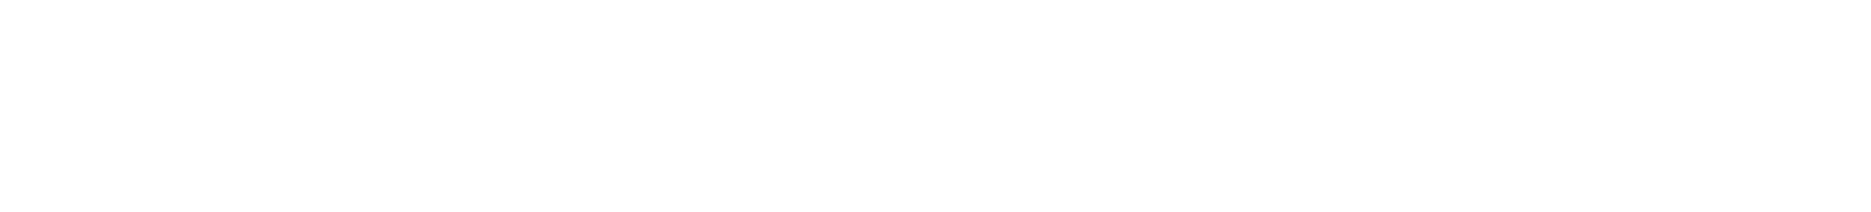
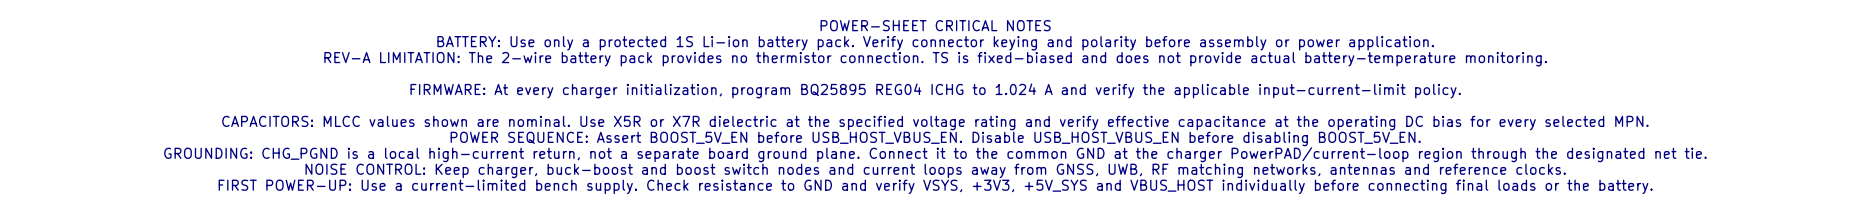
text: none -> POWER-SHEET CRITICAL NOTES (935, 25)
text: none -> BATTERY: Use only a protected 1S Li-ion battery pack. Verify connector keying and polarity before assembly or power application. (935, 43)
text: none -> REV-A LIMITATION: The 2-wire battery pack provides no thermistor connection. TS is fixed-biased and does not provide actual battery-temperature monitoring. (935, 59)
text: none -> FIRMWARE: At every charger initialization, program BQ25895 REG04 ICHG to 1.024 A and verify the applicable input-current-limit policy. (935, 90)
text: none -> CAPACITORS: MLCC values shown are nominal. Use X5R or X7R dielectric at the specified voltage rating and verify effective capacitance at the operating DC bias for every selected MPN. (935, 123)
text: none -> POWER SEQUENCE: Assert BOOST_5V_EN before USB_HOST_VBUS_EN. Disable USB_HOST_VBUS_EN before disabling BOOST_5V_EN. (935, 139)
text: none -> GROUNDING: CHG_PGND is a local high-current return, not a separate board ground plane. Connect it to the common GND at the charger PowerPAD/current-loop region through the designated net tie. (935, 154)
text: none -> NOISE CONTROL: Keep charger, buck-boost and boost switch nodes and current loops away from GNSS, UWB, RF matching networks, antennas and reference clocks. (935, 170)
text: none -> FIRST POWER-UP: Use a current-limited bench supply. Check resistance to GND and verify VSYS, +3V3, +5V_SYS and VBUS_HOST individually before connecting final loads or the battery. (935, 186)

